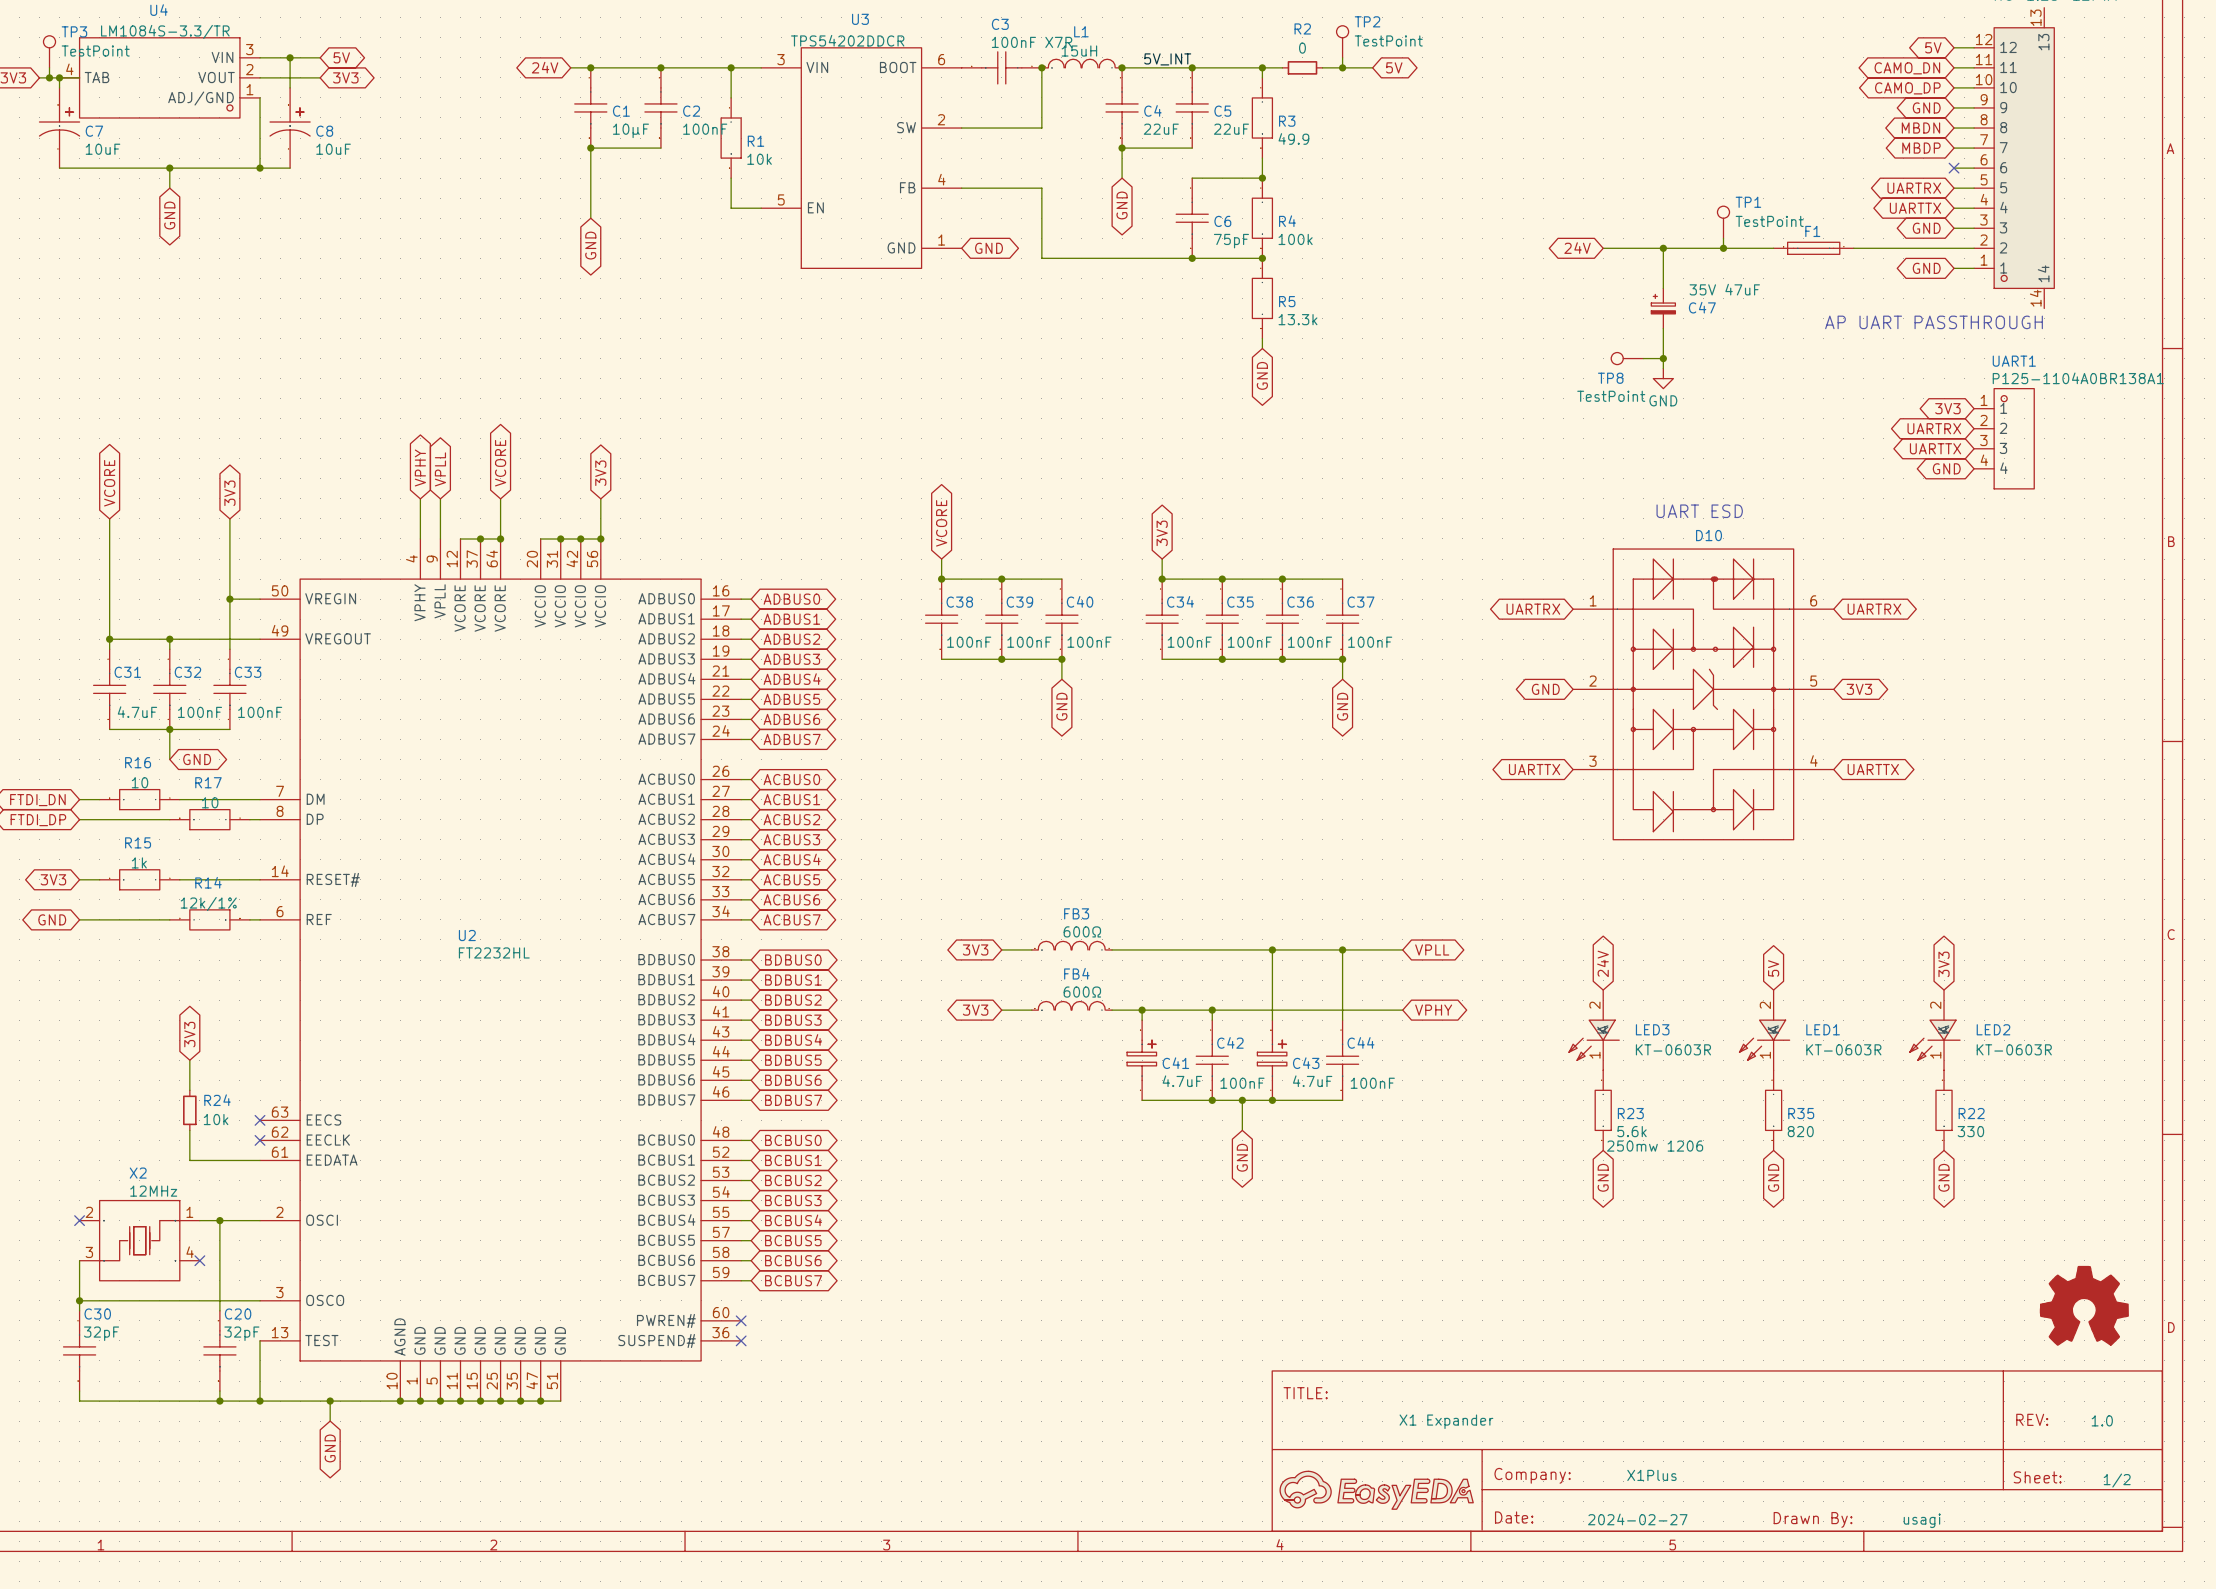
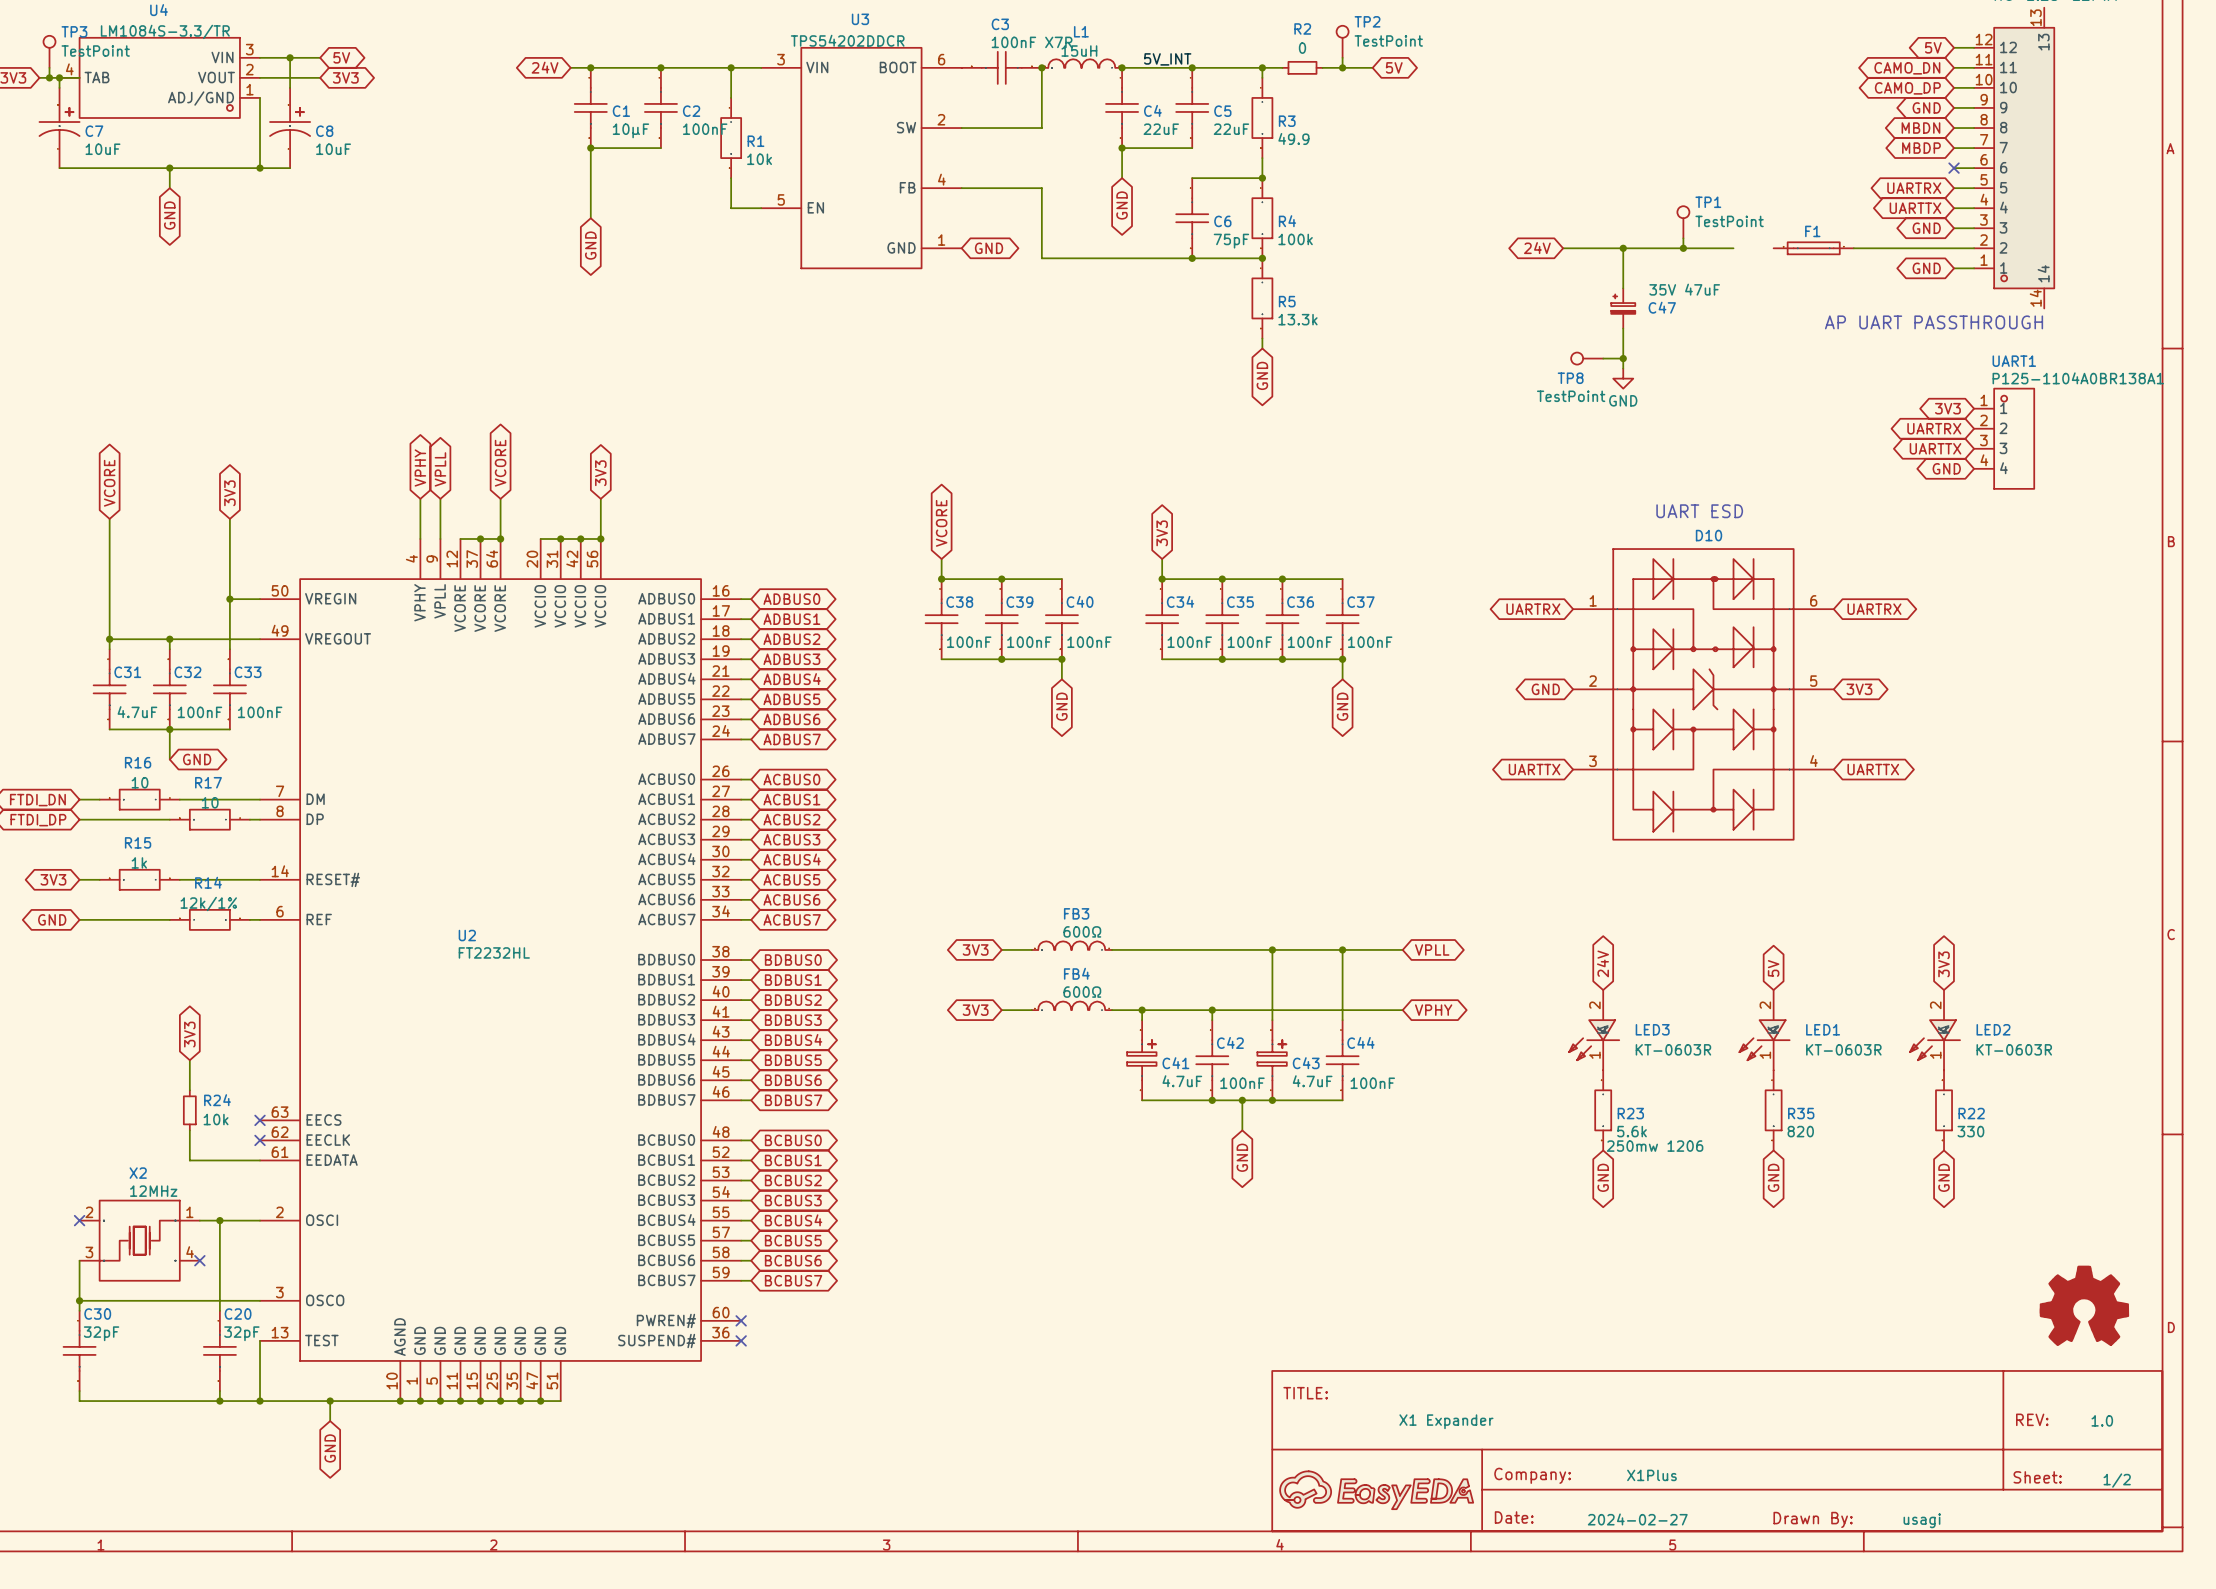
TP1 position: (1723, 222) -> (1683, 222)
wire: (1723, 238) (1723, 248) -> (1683, 238) (1683, 248)
global label position: 24V (1577, 248) -> 24V (1537, 248)
junction: none -> (1623, 248)
wire: (1663, 248) (1663, 288) -> (1623, 248) (1623, 288)
junction: (1663, 248) -> none
junction: none -> (1683, 248)
junction: (1723, 248) -> none
wire: (1733, 248) (1773, 248) -> (1563, 248) (1603, 248)
C47 position: (1663, 308) -> (1623, 308)
wire: (1663, 328) (1663, 368) -> (1623, 328) (1623, 368)
TP8 position: (1627, 358) -> (1587, 358)
wire: (1643, 358) (1663, 358) -> (1603, 358) (1623, 358)
junction position: (1663, 358) -> (1623, 358)
power symbol position: GND (1663, 378) -> GND (1623, 378)

